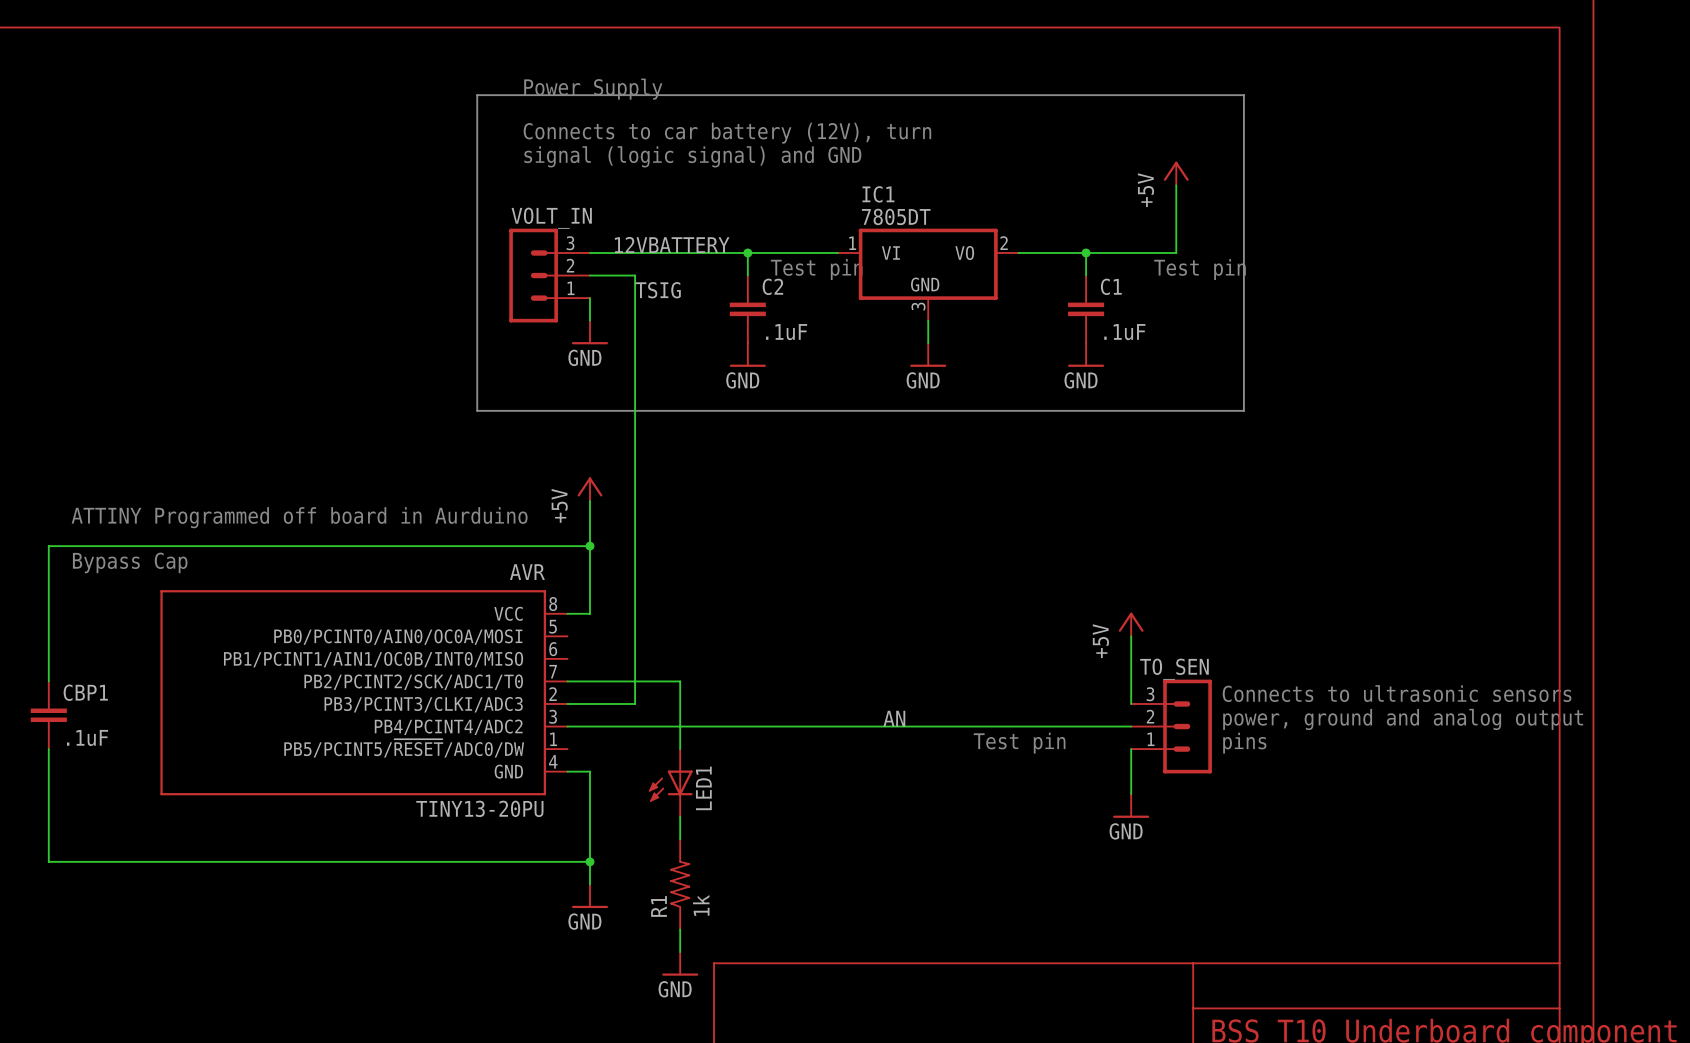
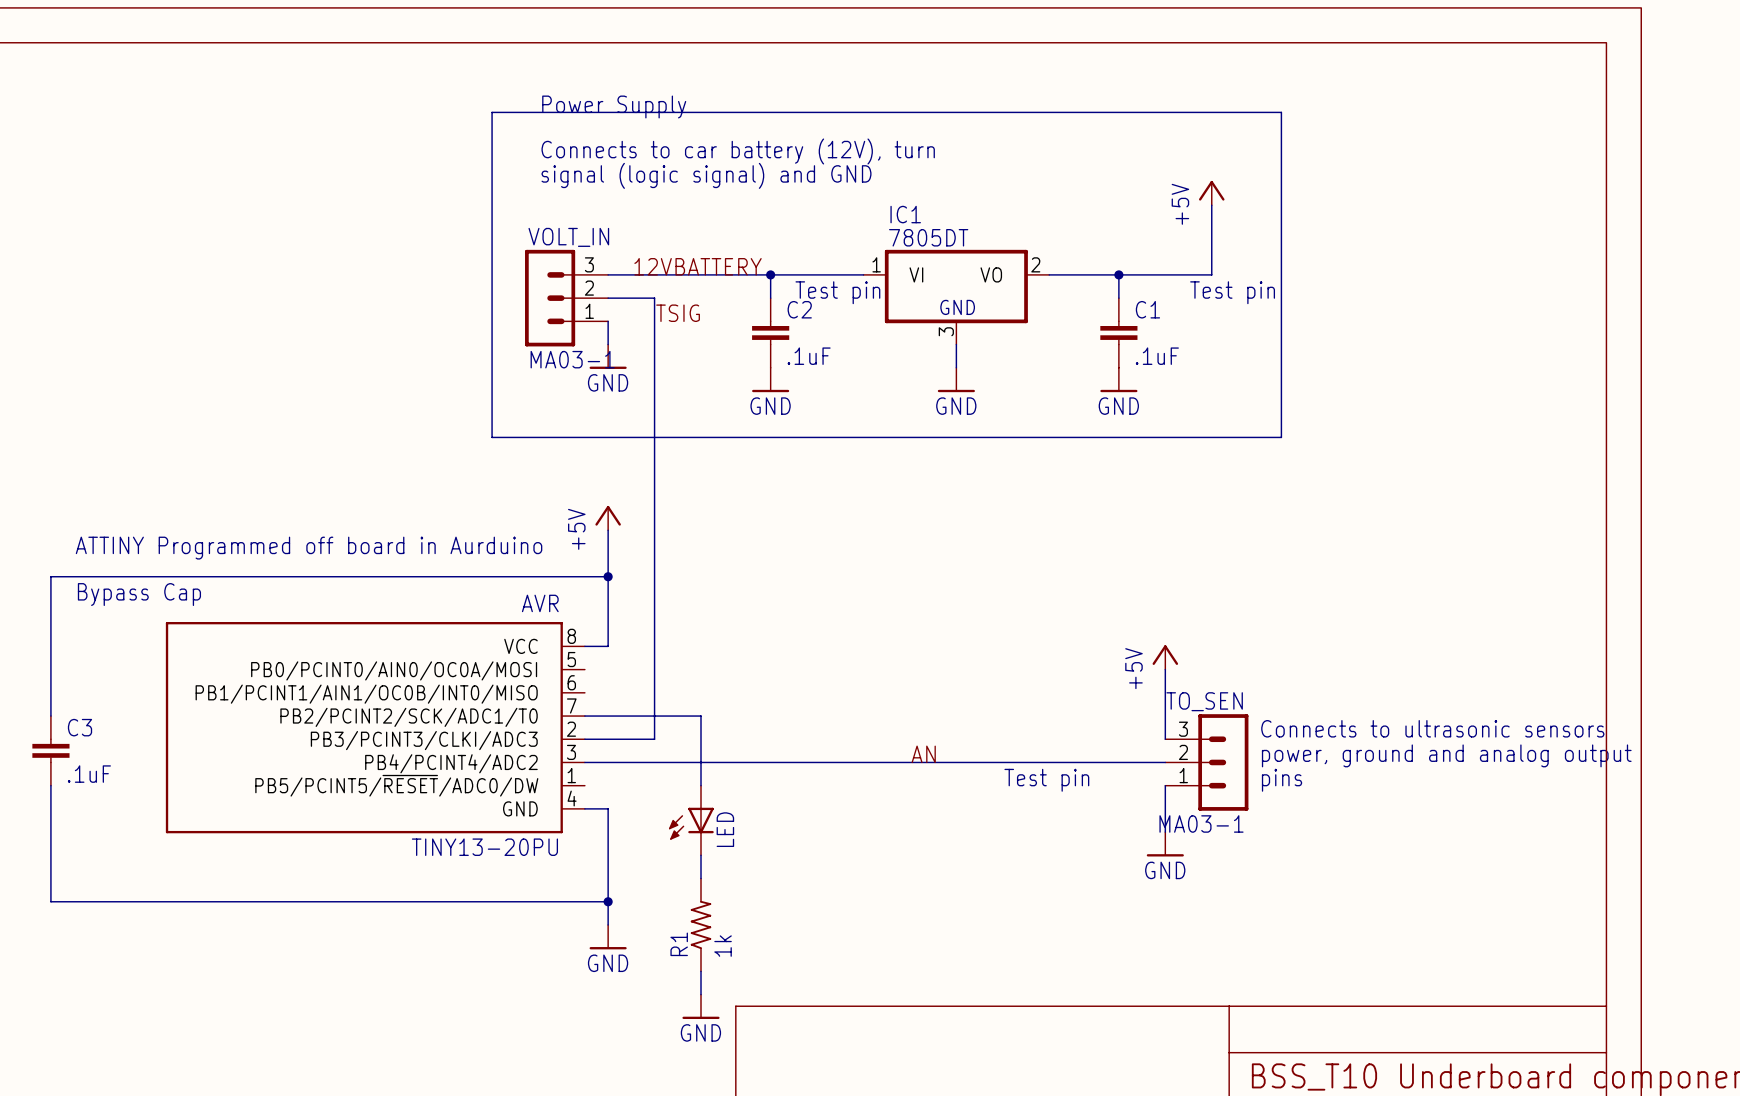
VOLT_IN value: none -> MA03-1 (572, 359)
CBP1 name: CBP1 (85, 692) -> C3 (80, 727)
TO_SEN value: none -> MA03-1 (1201, 823)
LED1 name: LED1 (703, 788) -> LED (725, 829)

